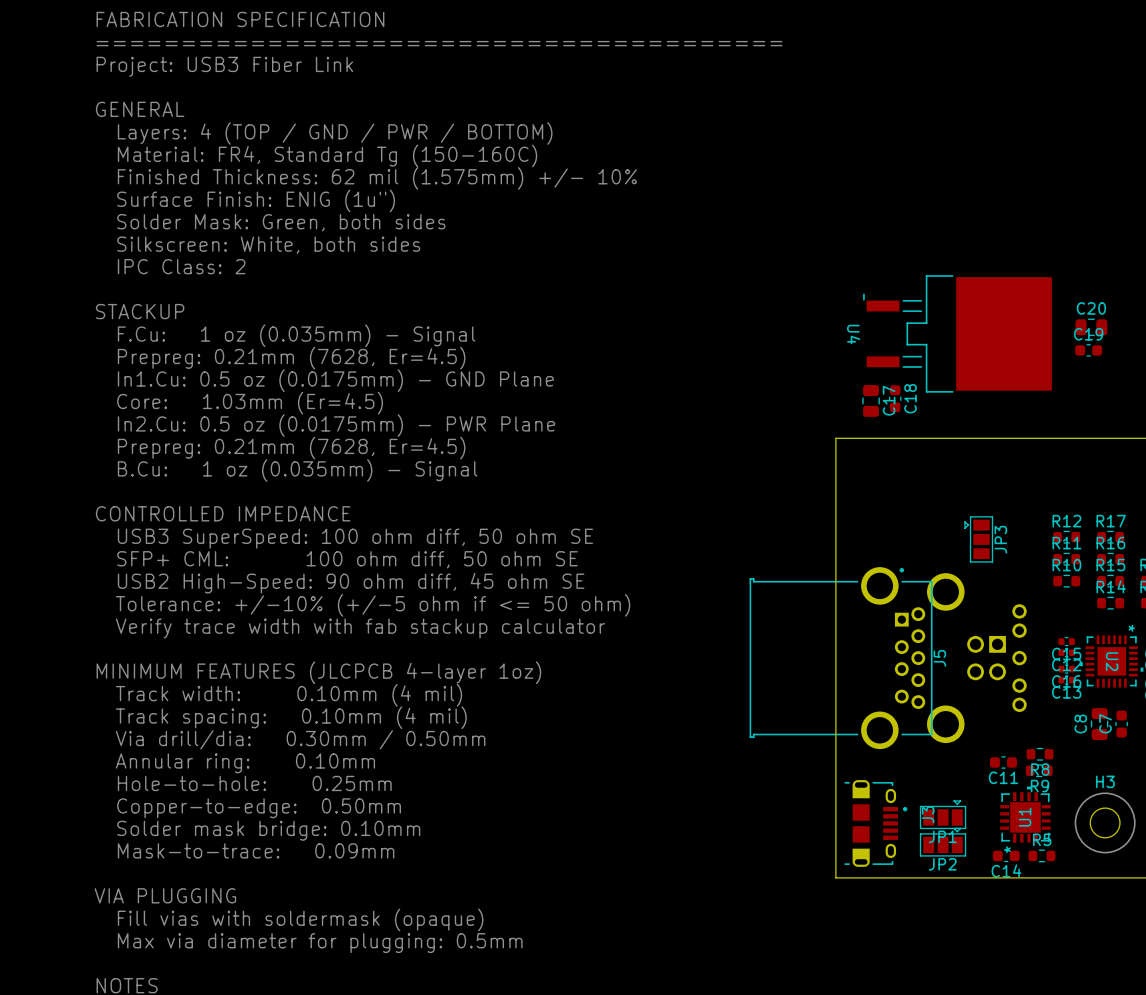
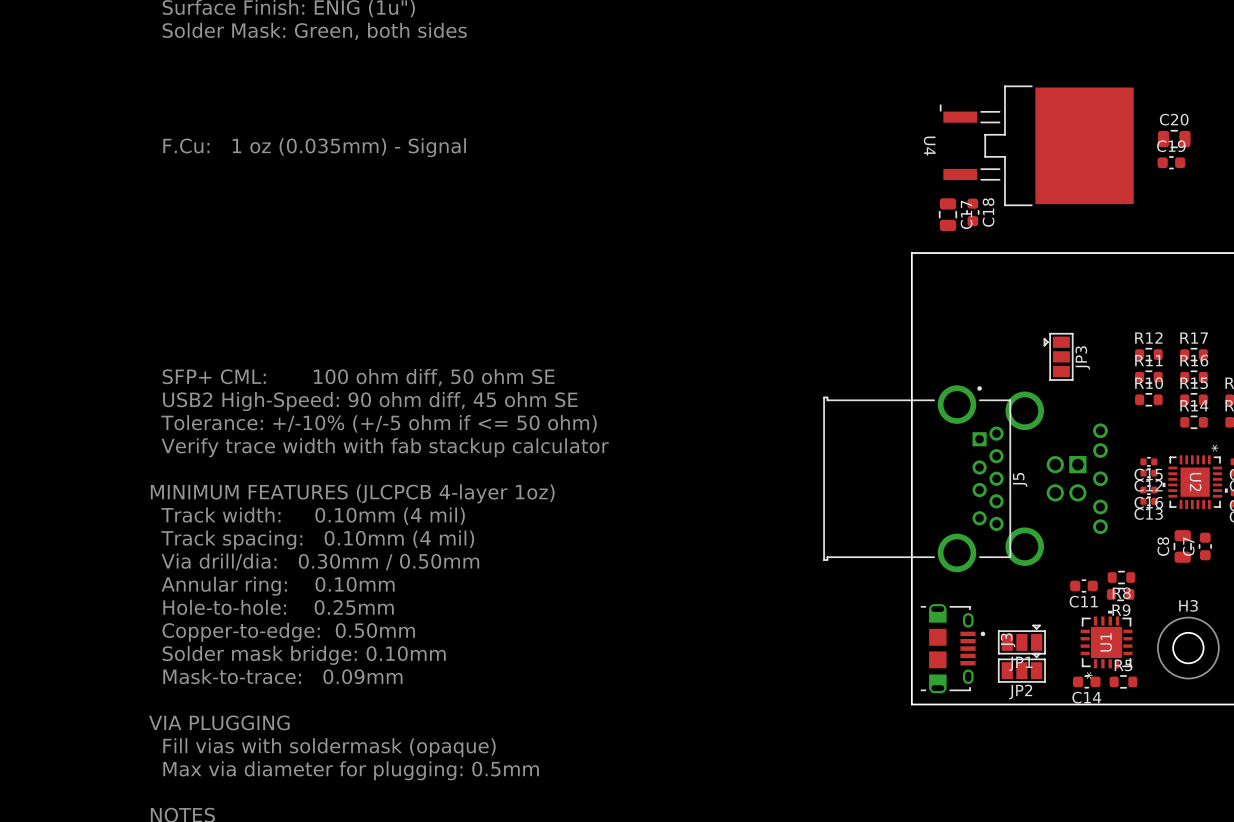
text: Silkscreen: White, both sides (268, 245) -> none
text: IPC Class: 2 (181, 266) -> none
text: STACKUP (140, 311) -> none
text: Prepreg: 0.21mm (7628, Er=4.5) (291, 358) -> none
text: In1.Cu: 0.5 oz (0.0175mm) - GND Plane (335, 380) -> none
text: Core: 1.03mm (Er=4.5) (250, 403) -> none
text: In2.Cu: 0.5 oz (0.0175mm) - PWR Plane (336, 425) -> none
text: Prepreg: 0.21mm (7628, Er=4.5) (291, 448) -> none
text: B.Cu: 1 oz (0.035mm) - Signal (297, 470) -> none
text: CONTROLLED IMPEDANCE (223, 513) -> none
text: USB3 SuperSpeed: 100 ohm diff, 50 ohm SE (355, 538) -> none

